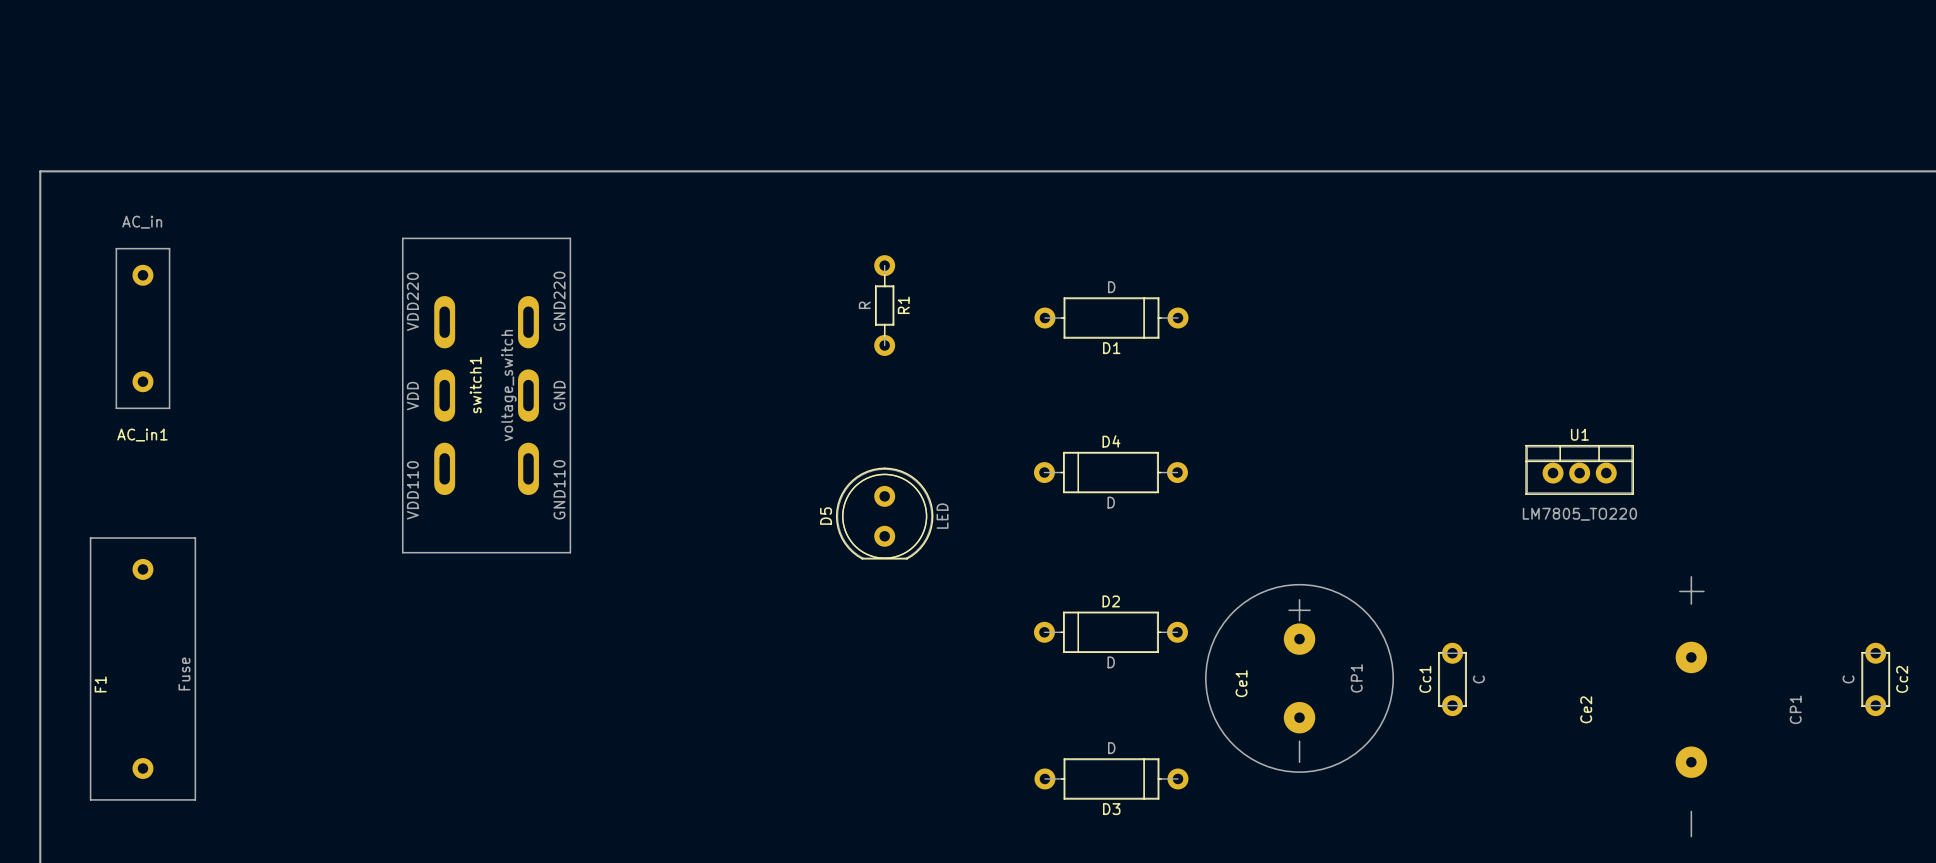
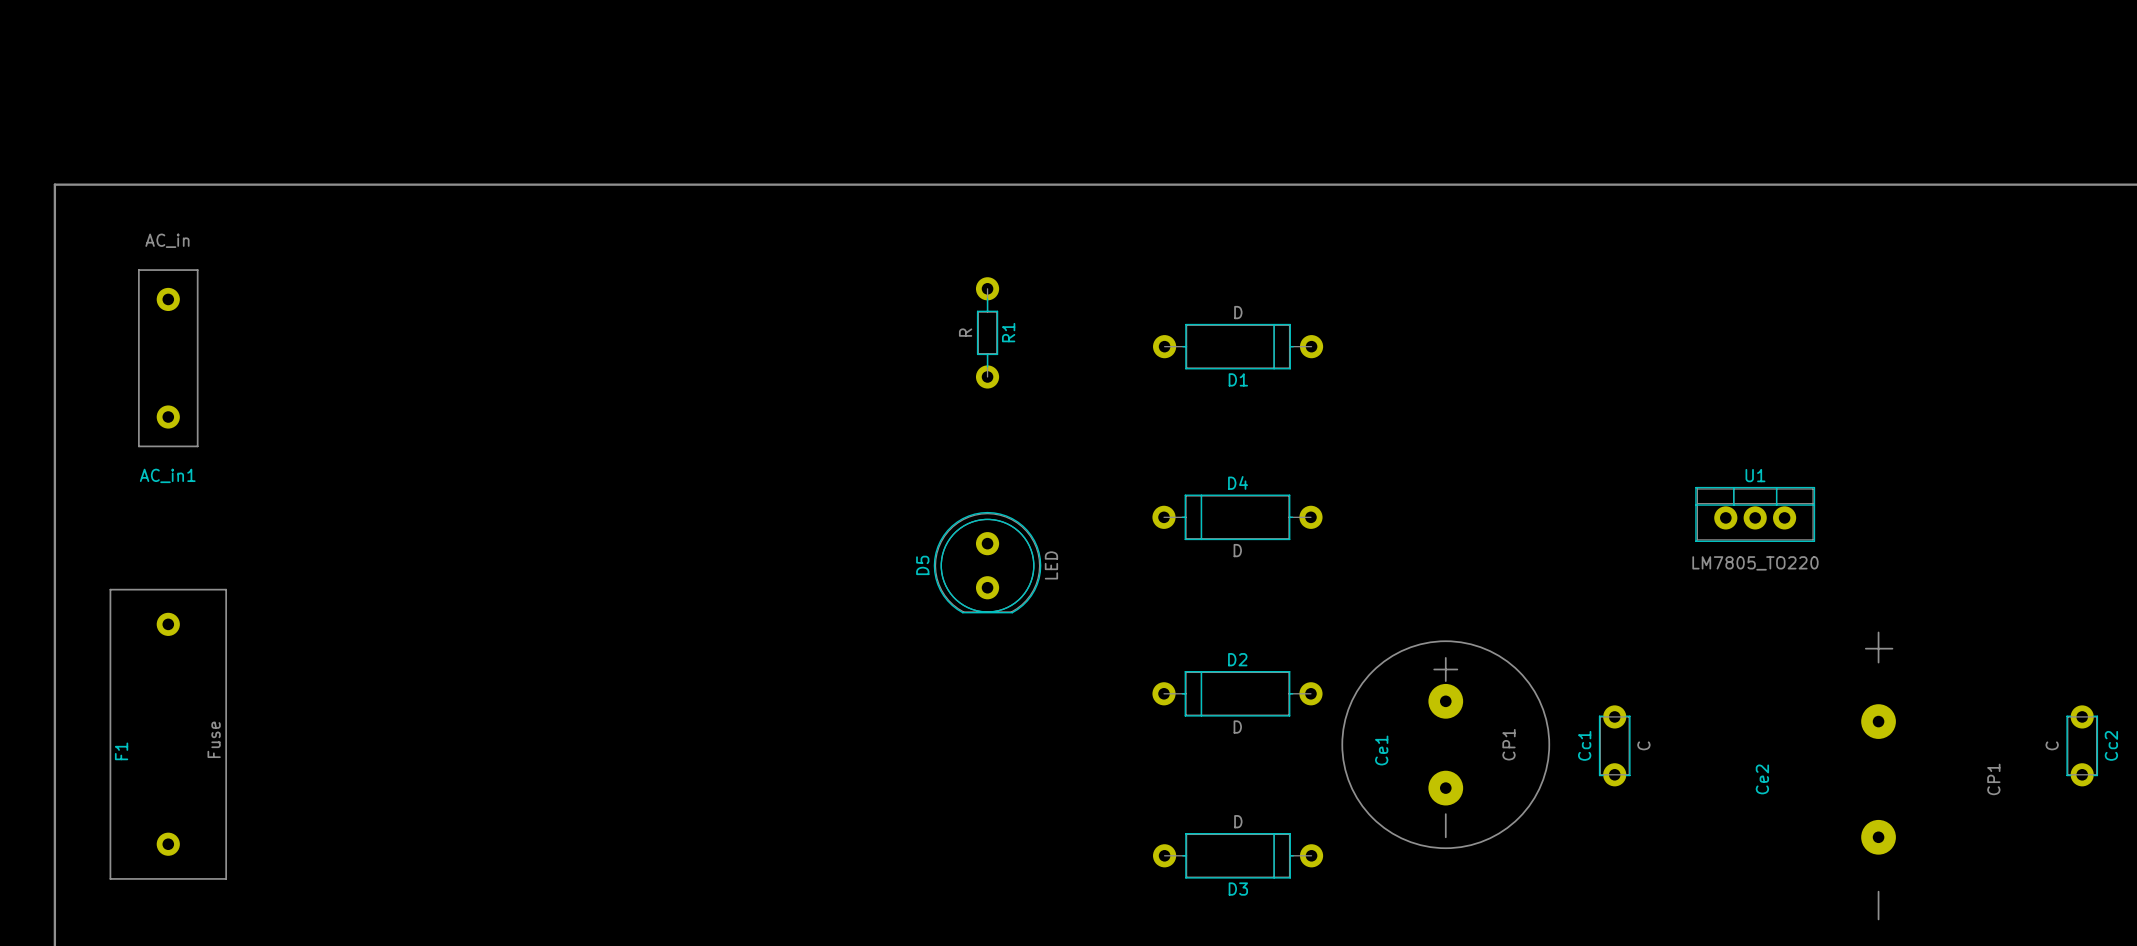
switch1: voltage_switch (486, 395) -> none

